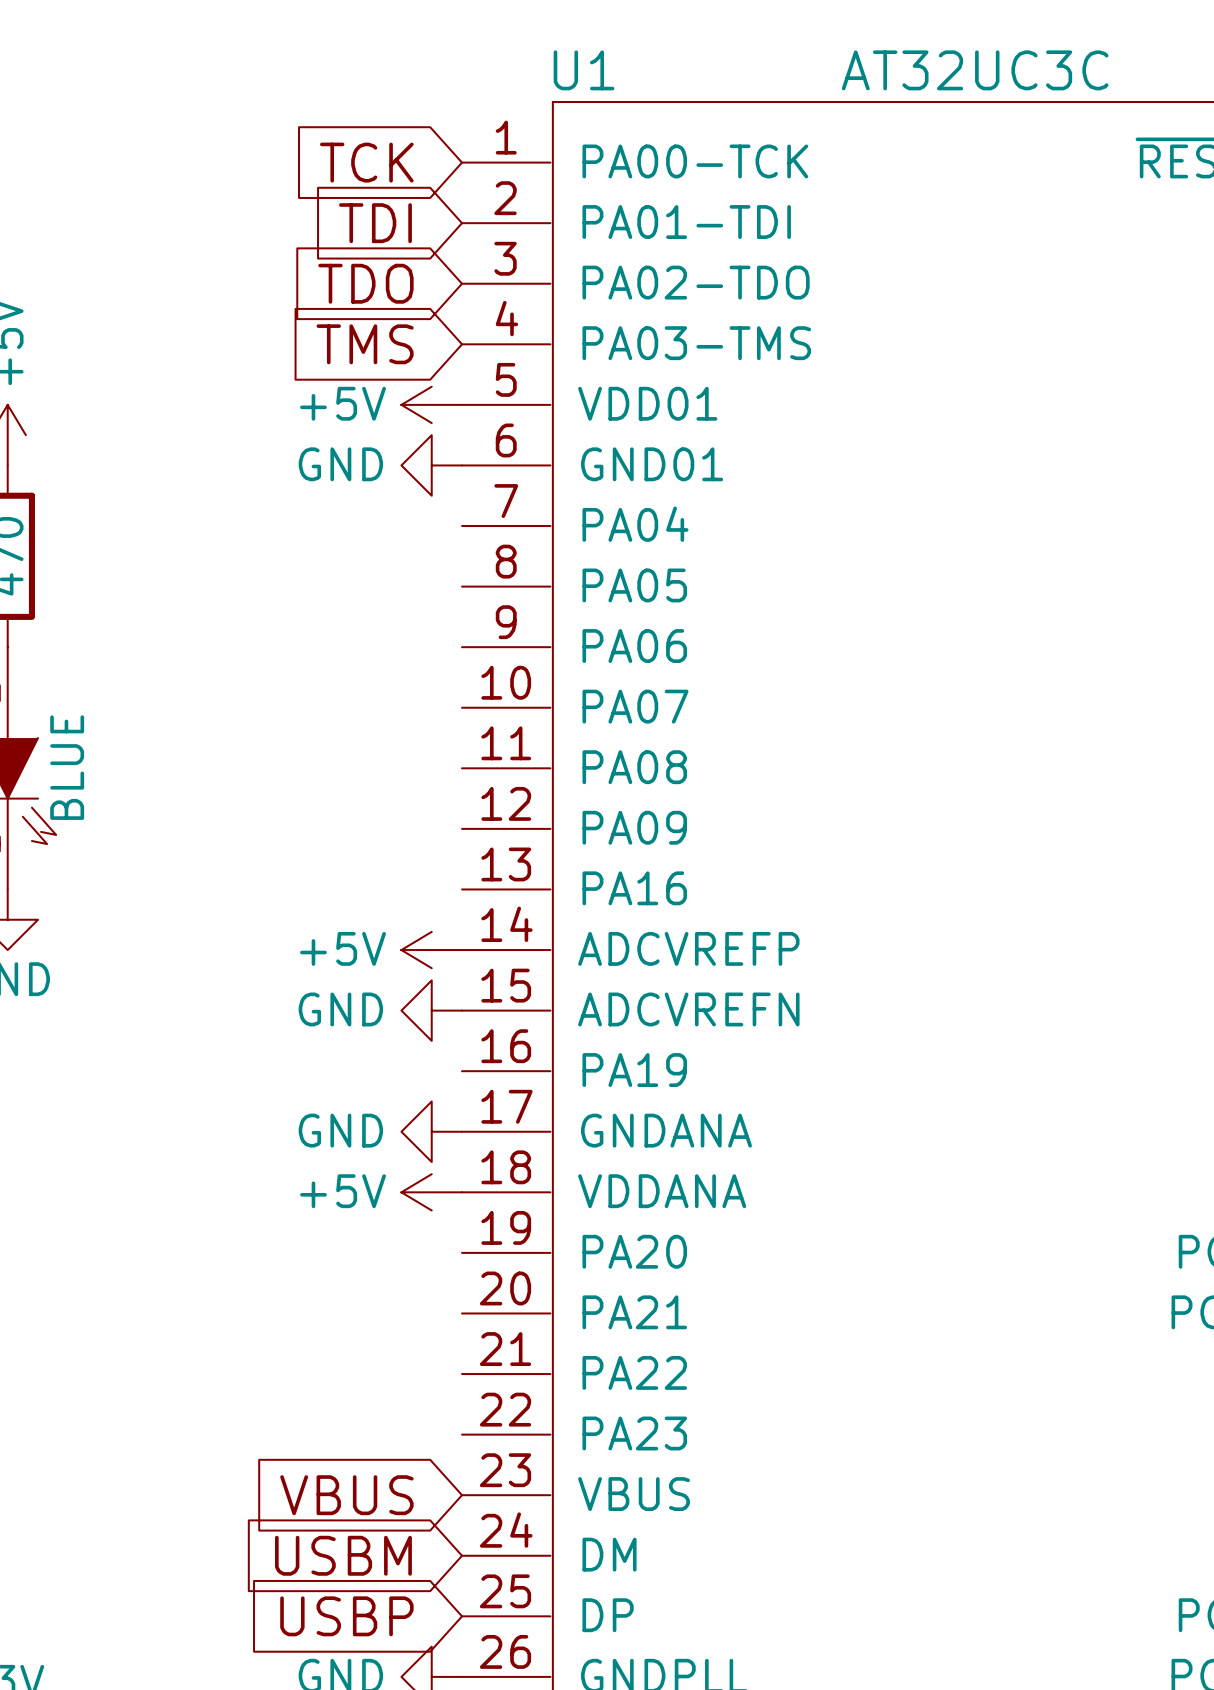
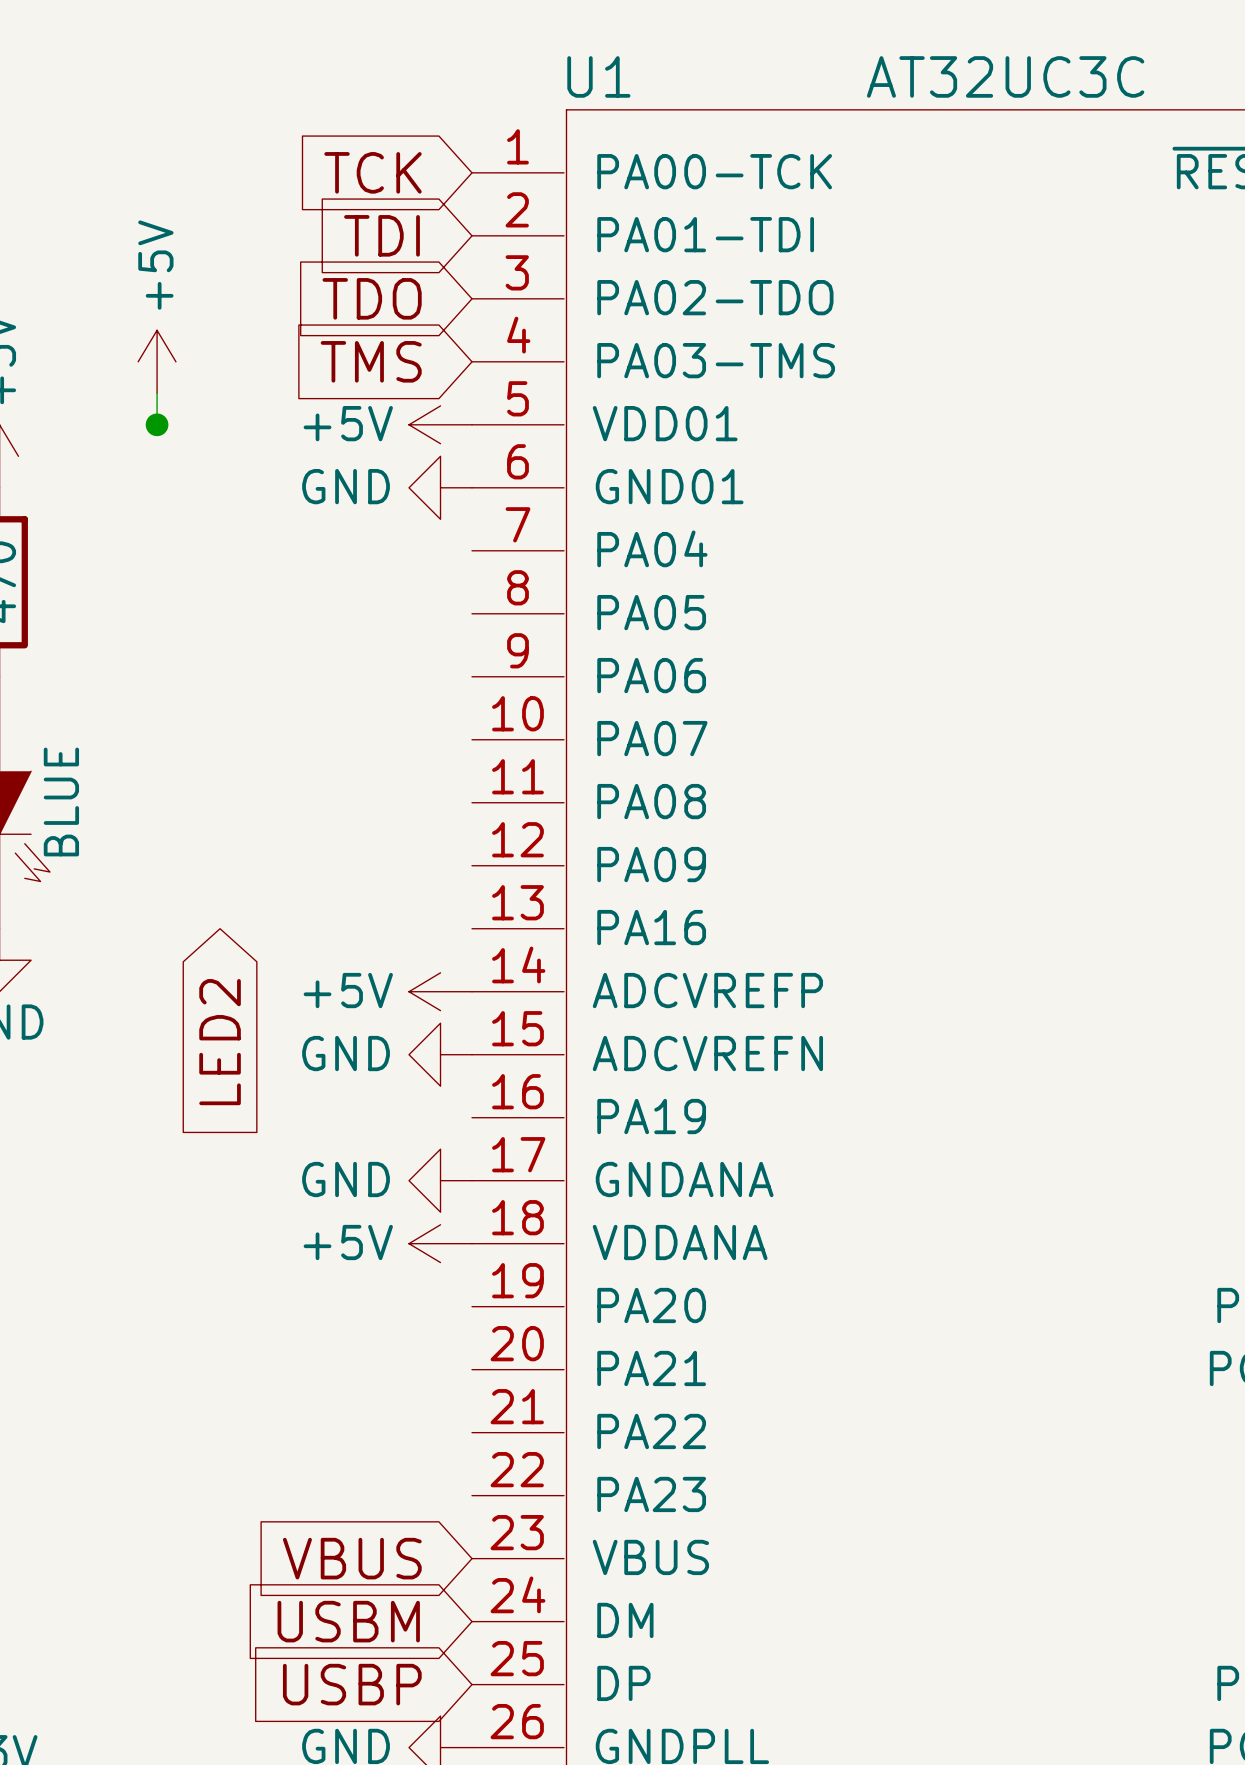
power symbol: none -> +5V (157, 361)
wire: none -> (157, 393) (157, 424)
junction: none -> (157, 424)
global label: none -> LED2 (220, 1042)

